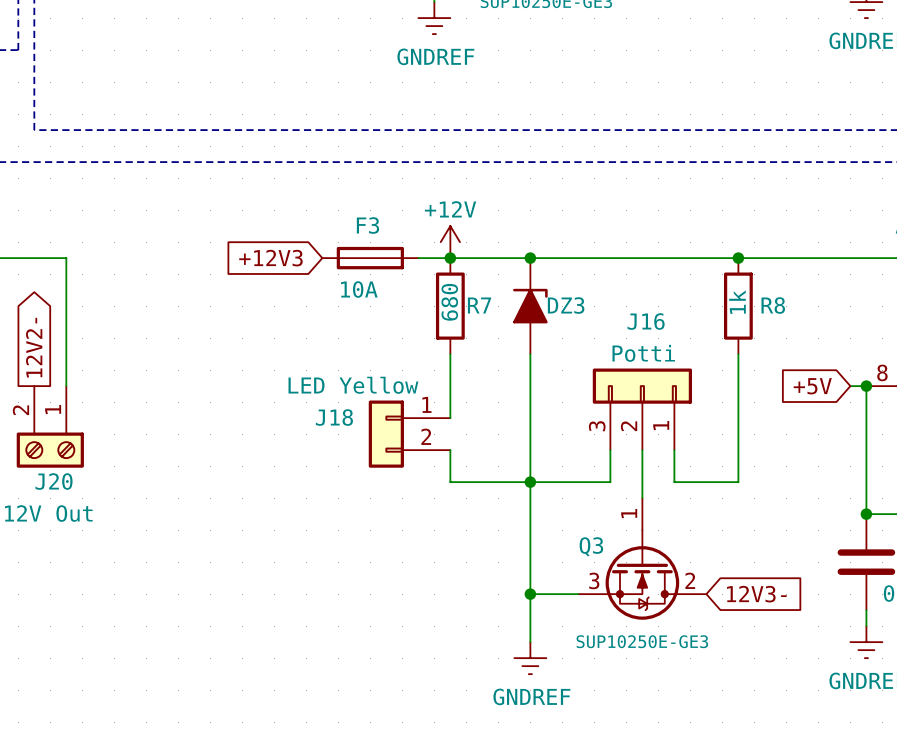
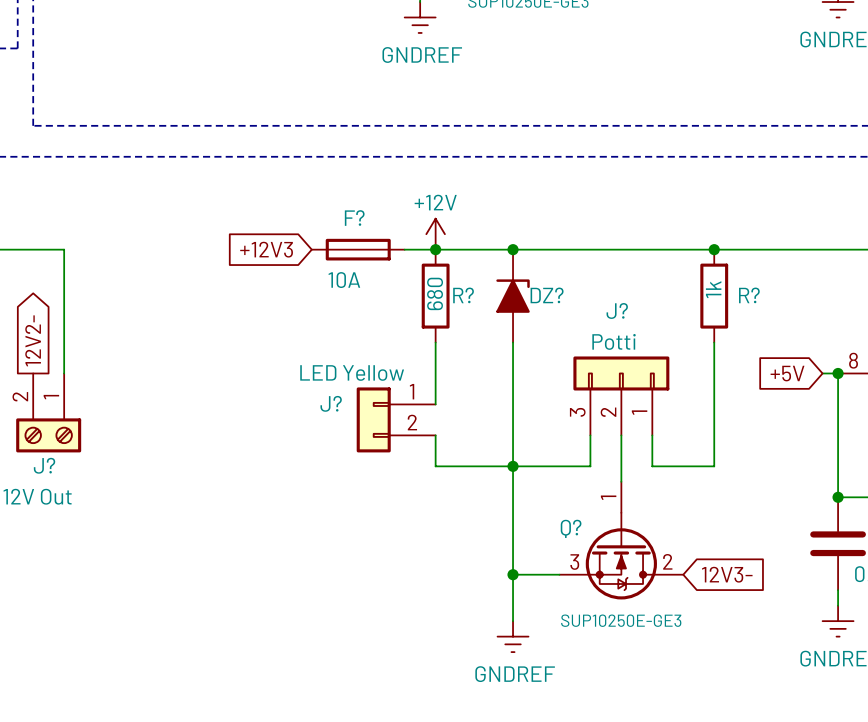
F3 name: F3 (367, 225) -> F? (354, 218)
R7 name: R7 (479, 305) -> R? (463, 295)
DZ3 name: DZ3 (566, 305) -> DZ? (547, 295)
R8 name: R8 (773, 305) -> R? (749, 295)
J16 name: J16 (646, 321) -> J? (617, 310)
J18 name: J18 (334, 417) -> J? (331, 403)
J20 name: J20 (54, 481) -> J? (44, 465)
Q3 name: Q3 (591, 546) -> Q? (571, 528)

